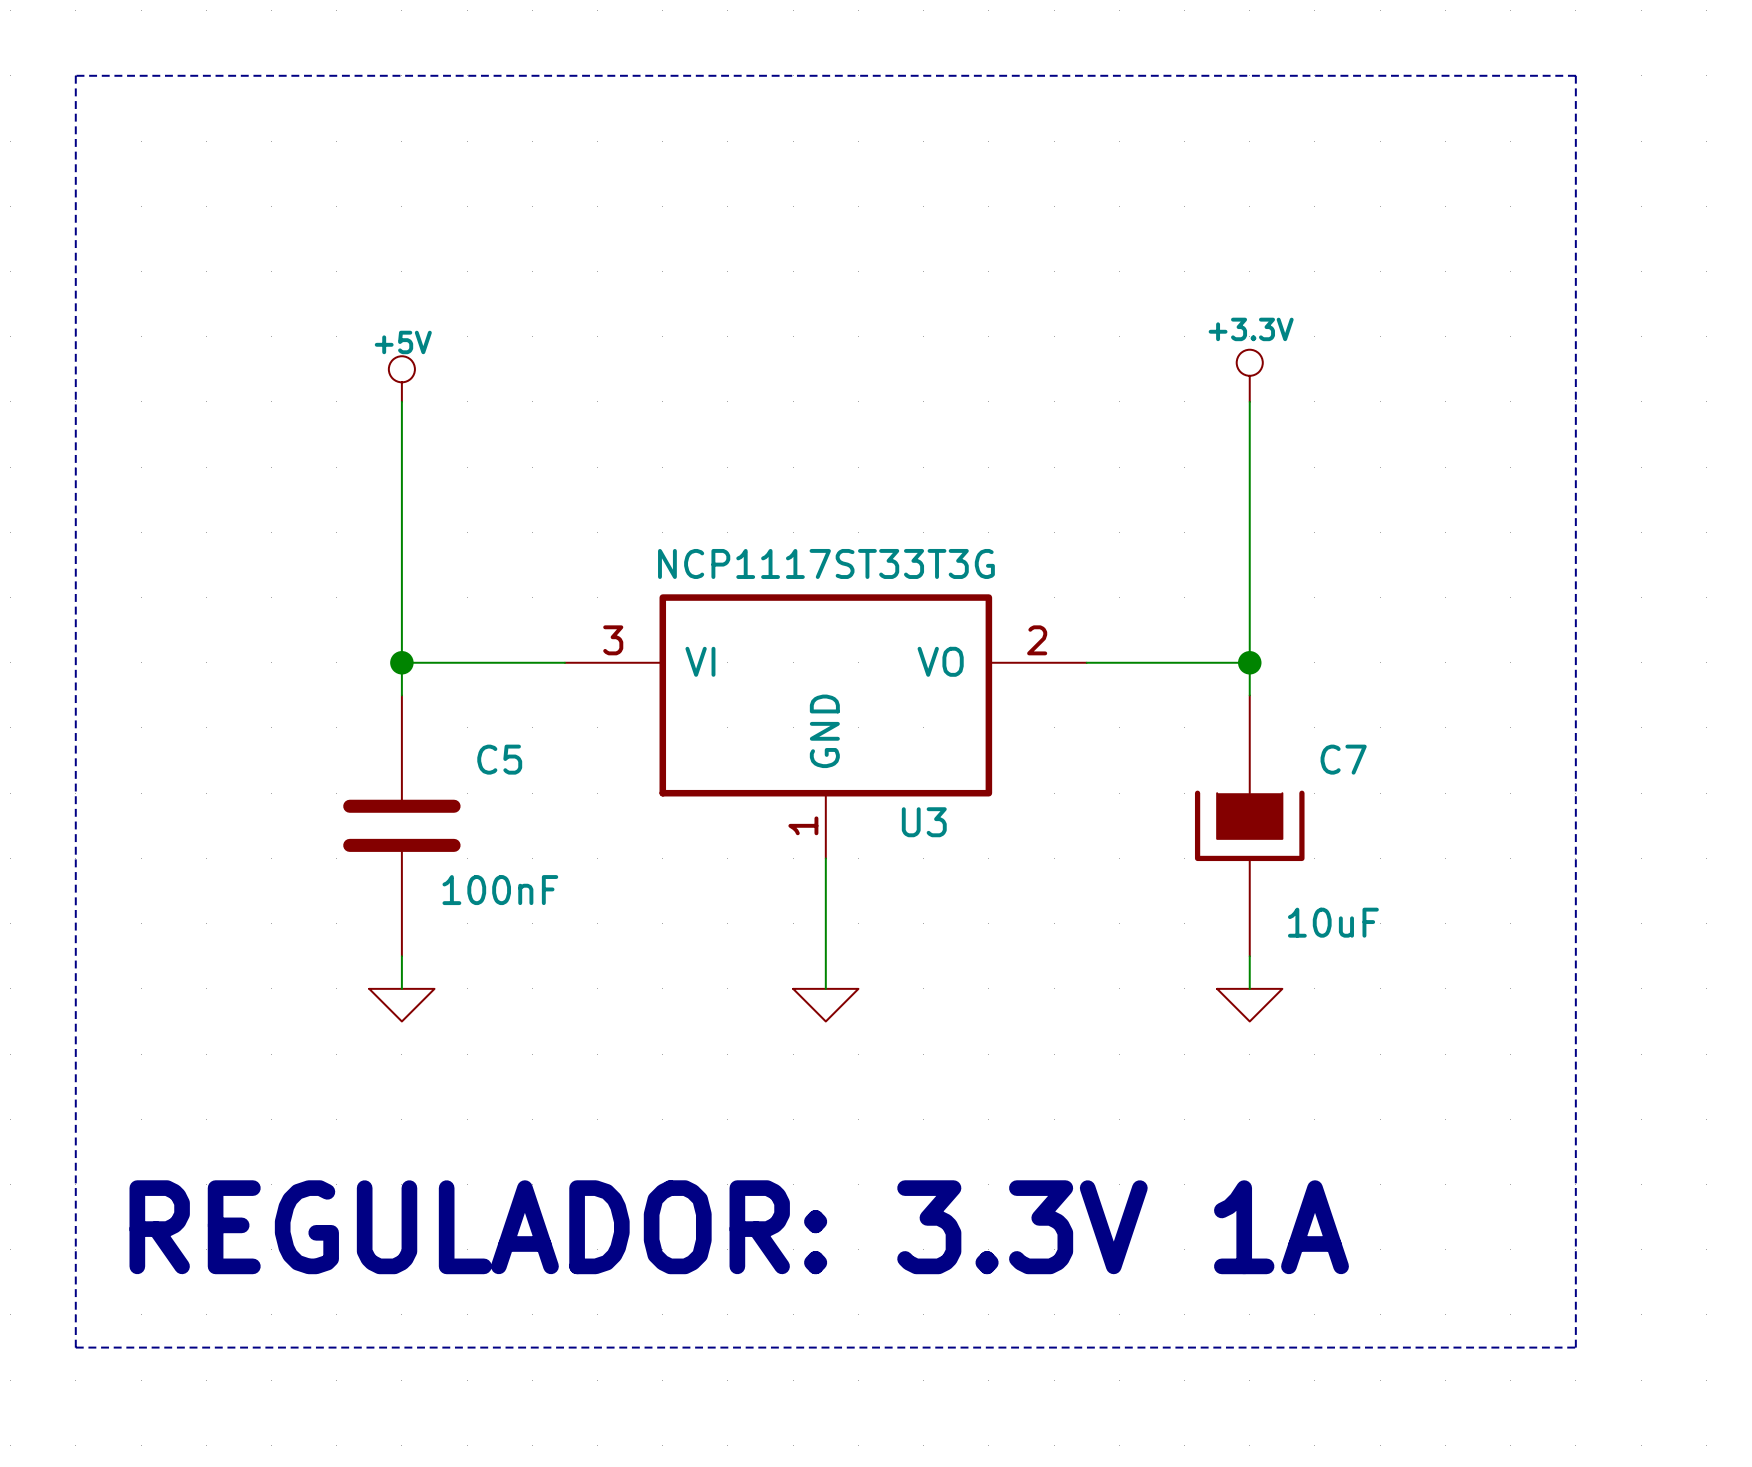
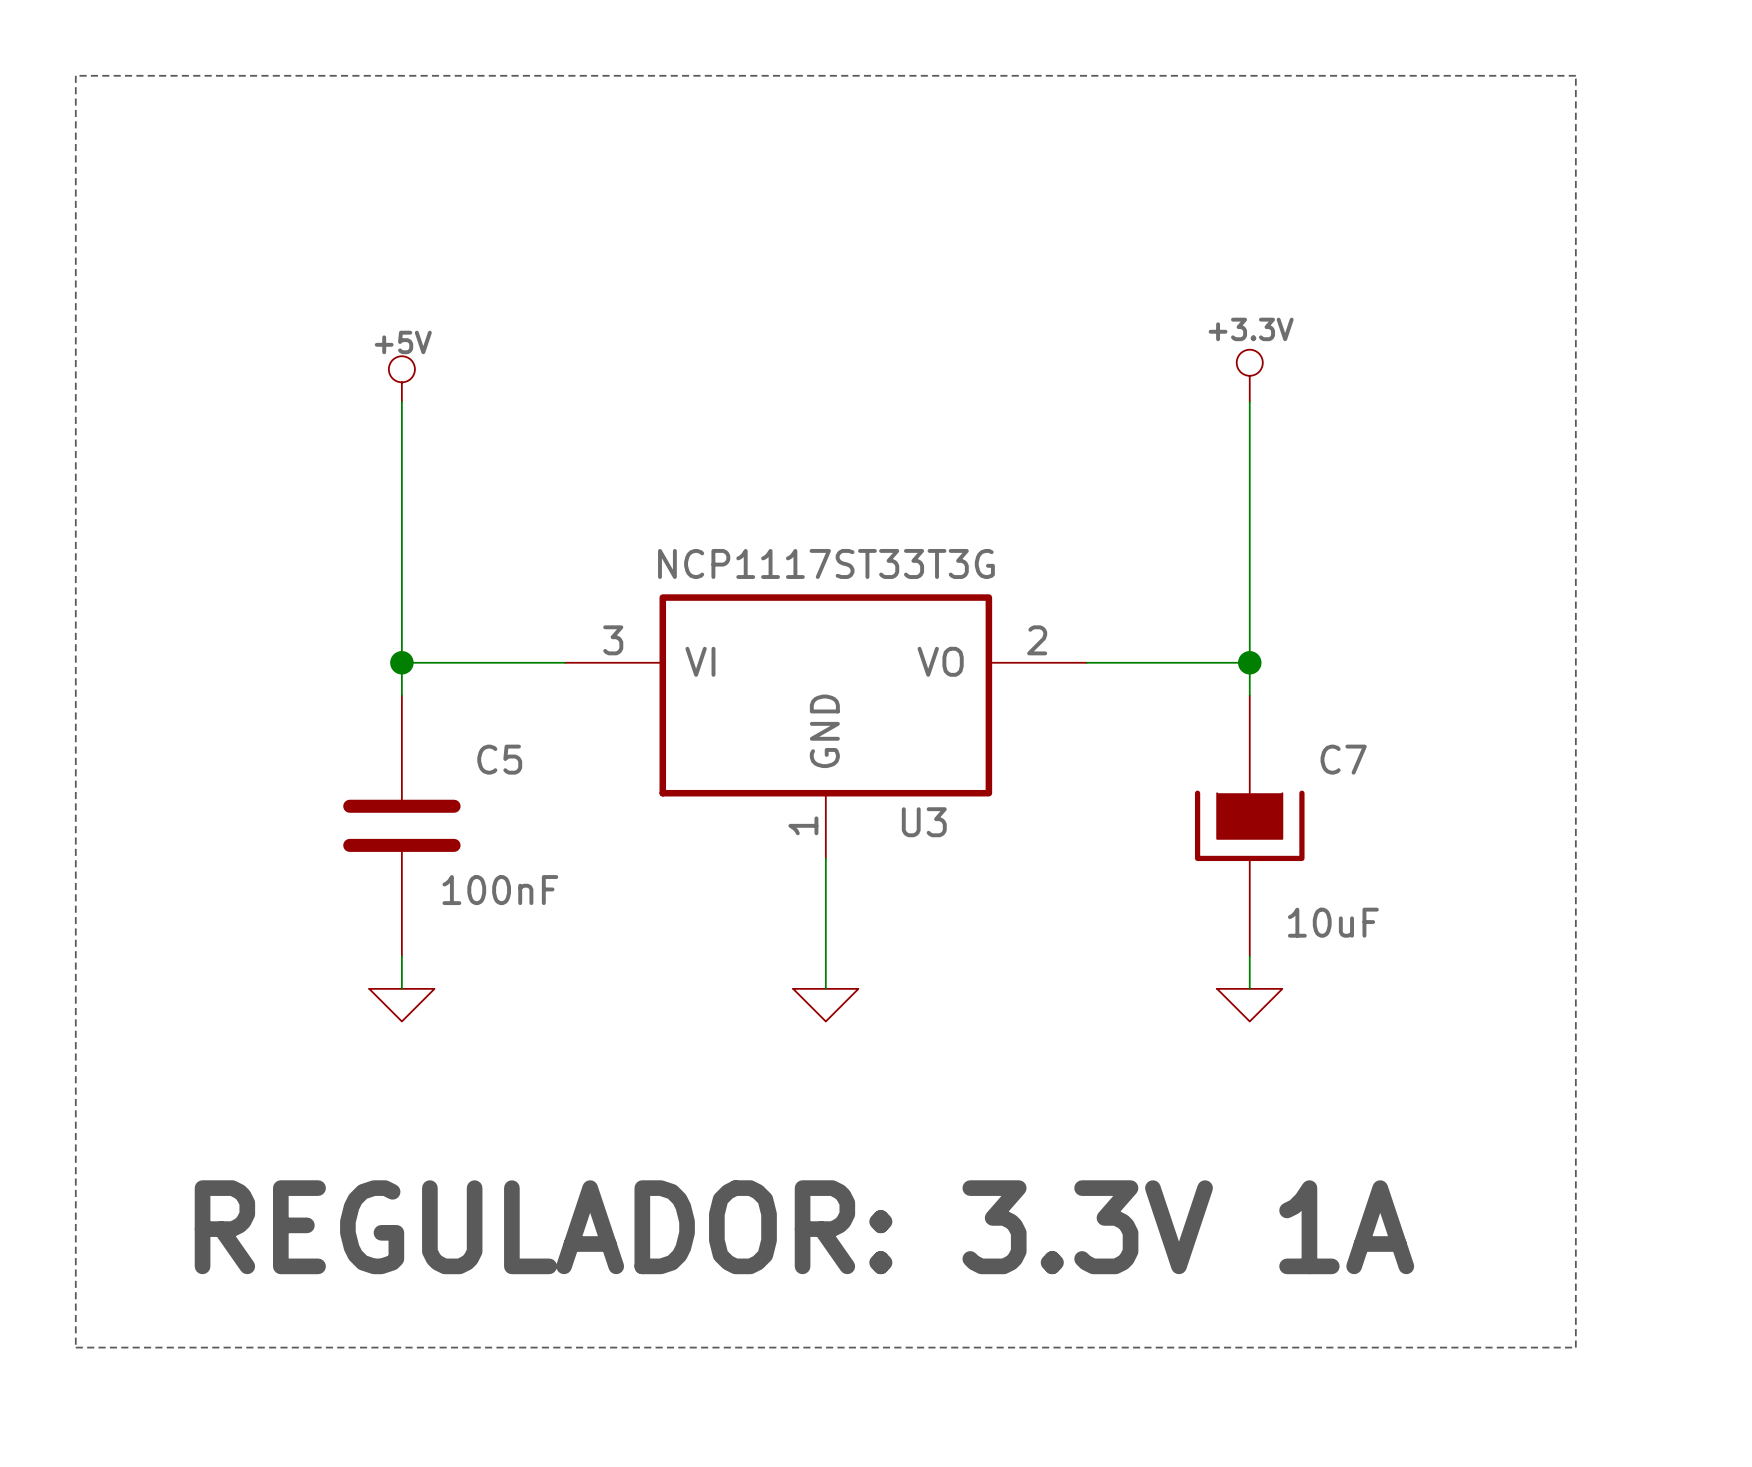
text position: REGULADOR: 3.3V 1A (739, 1227) -> REGULADOR: 3.3V 1A (804, 1227)

